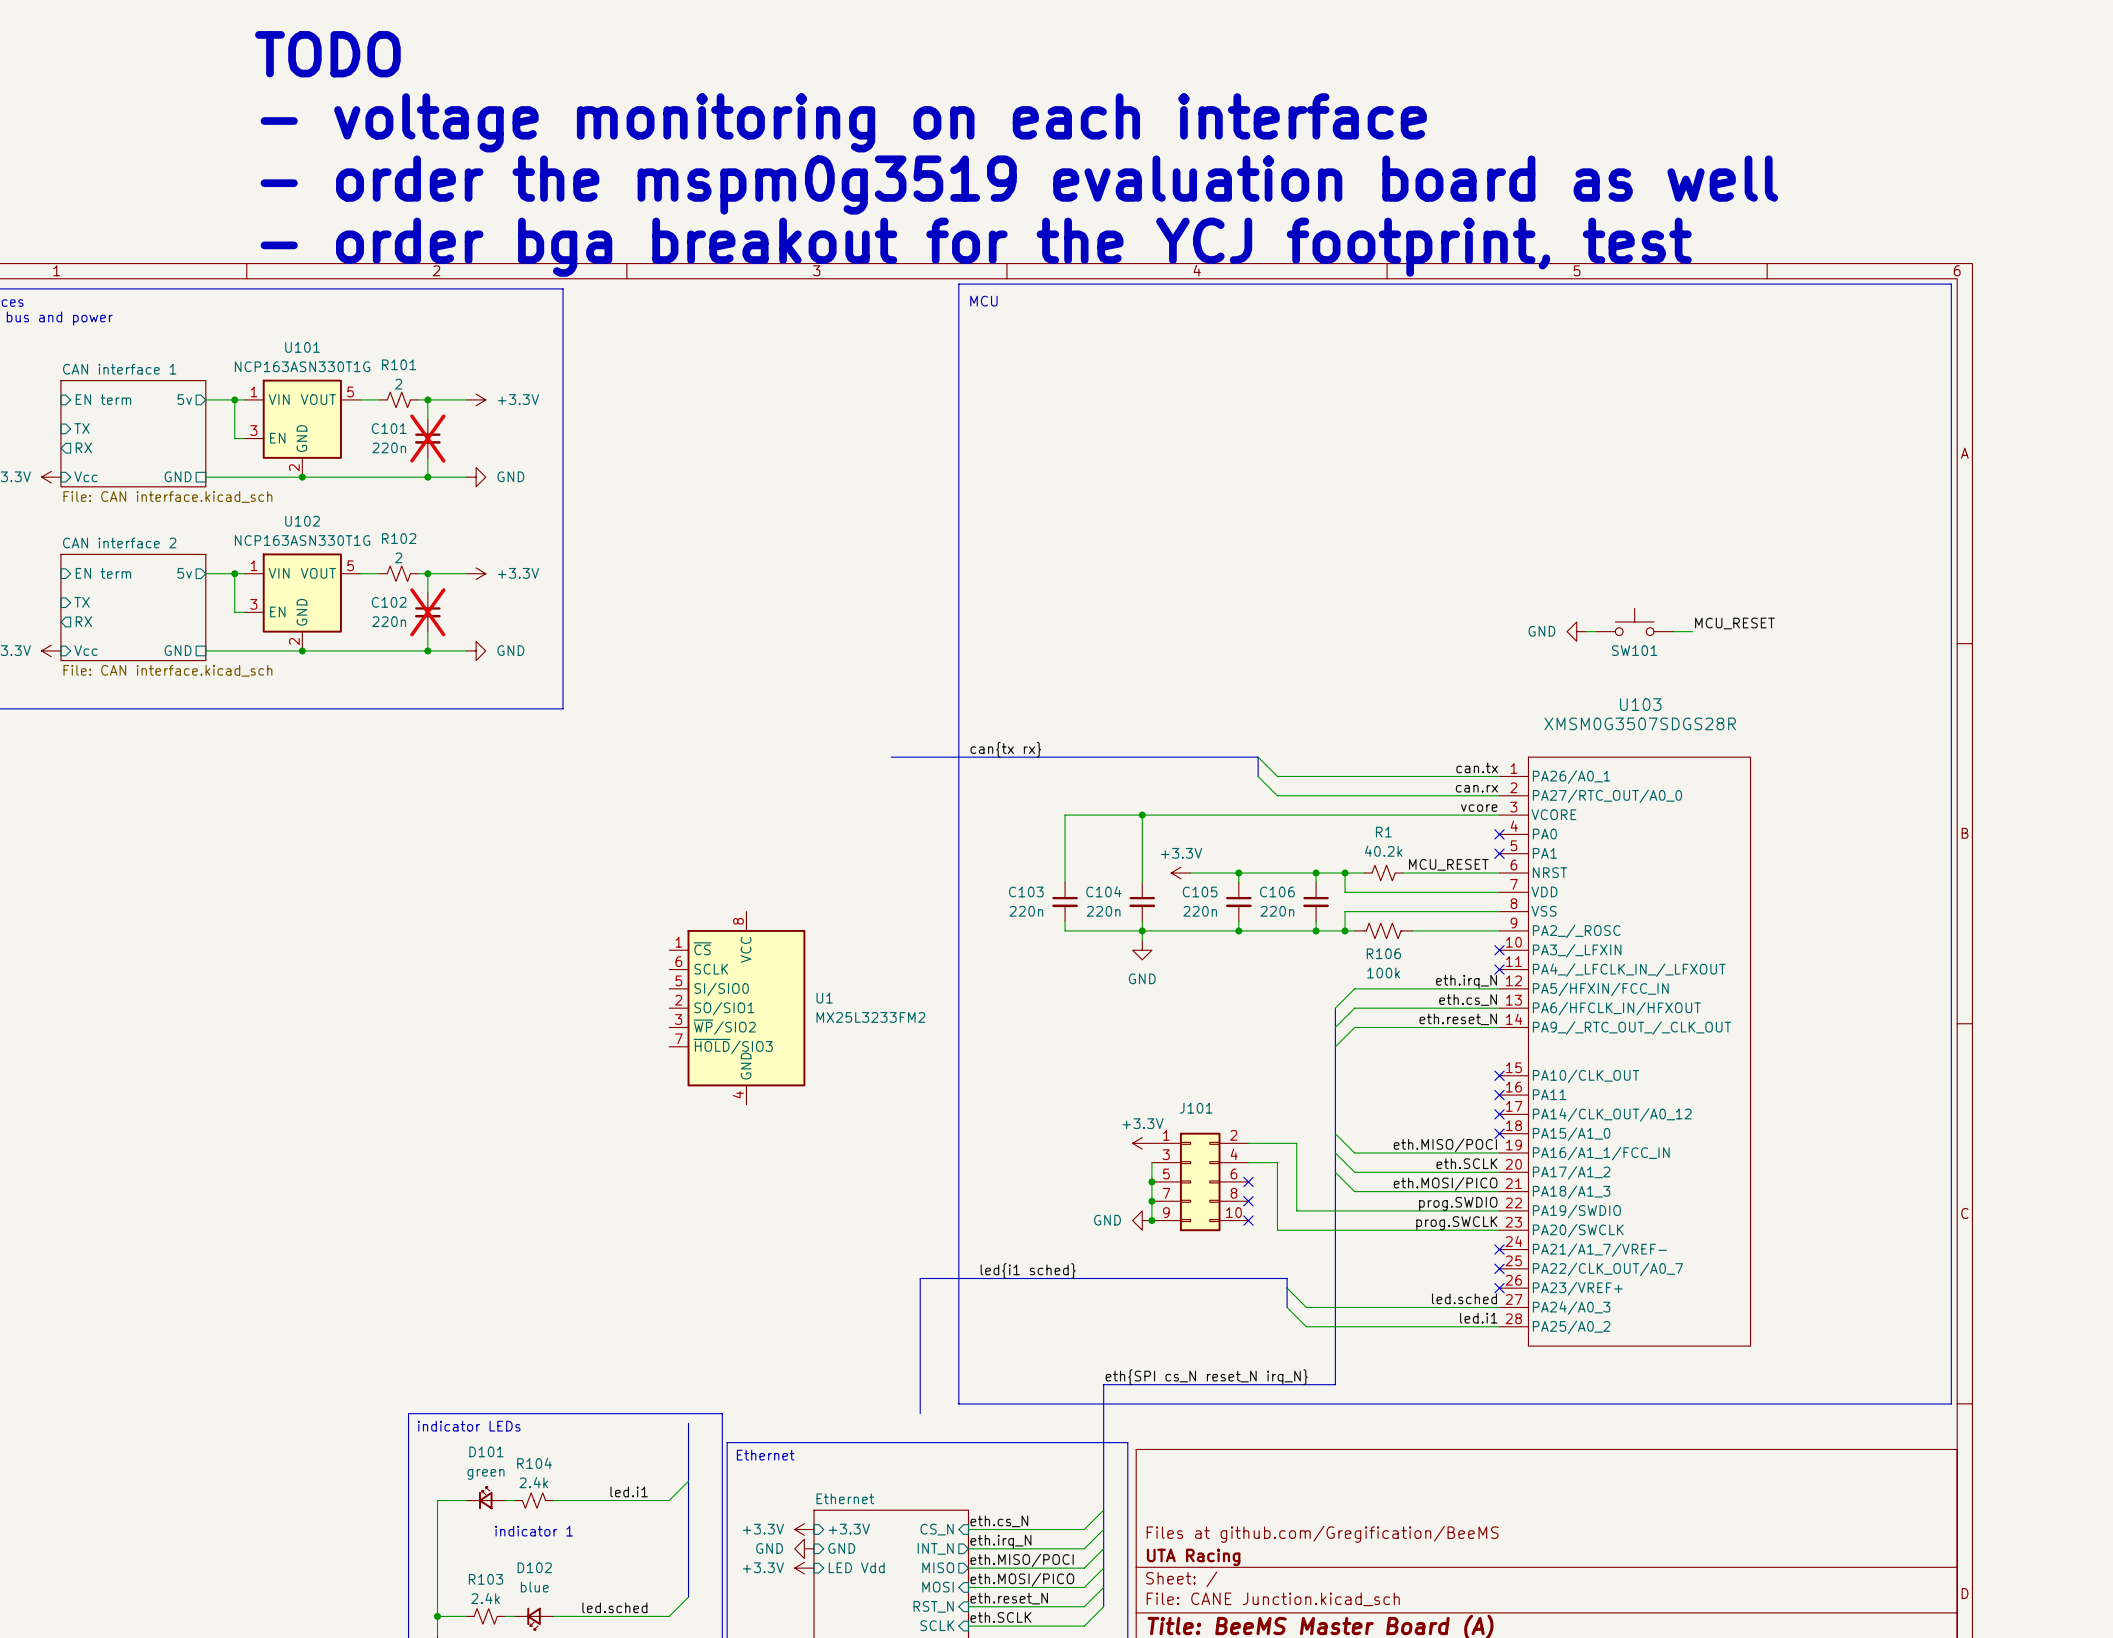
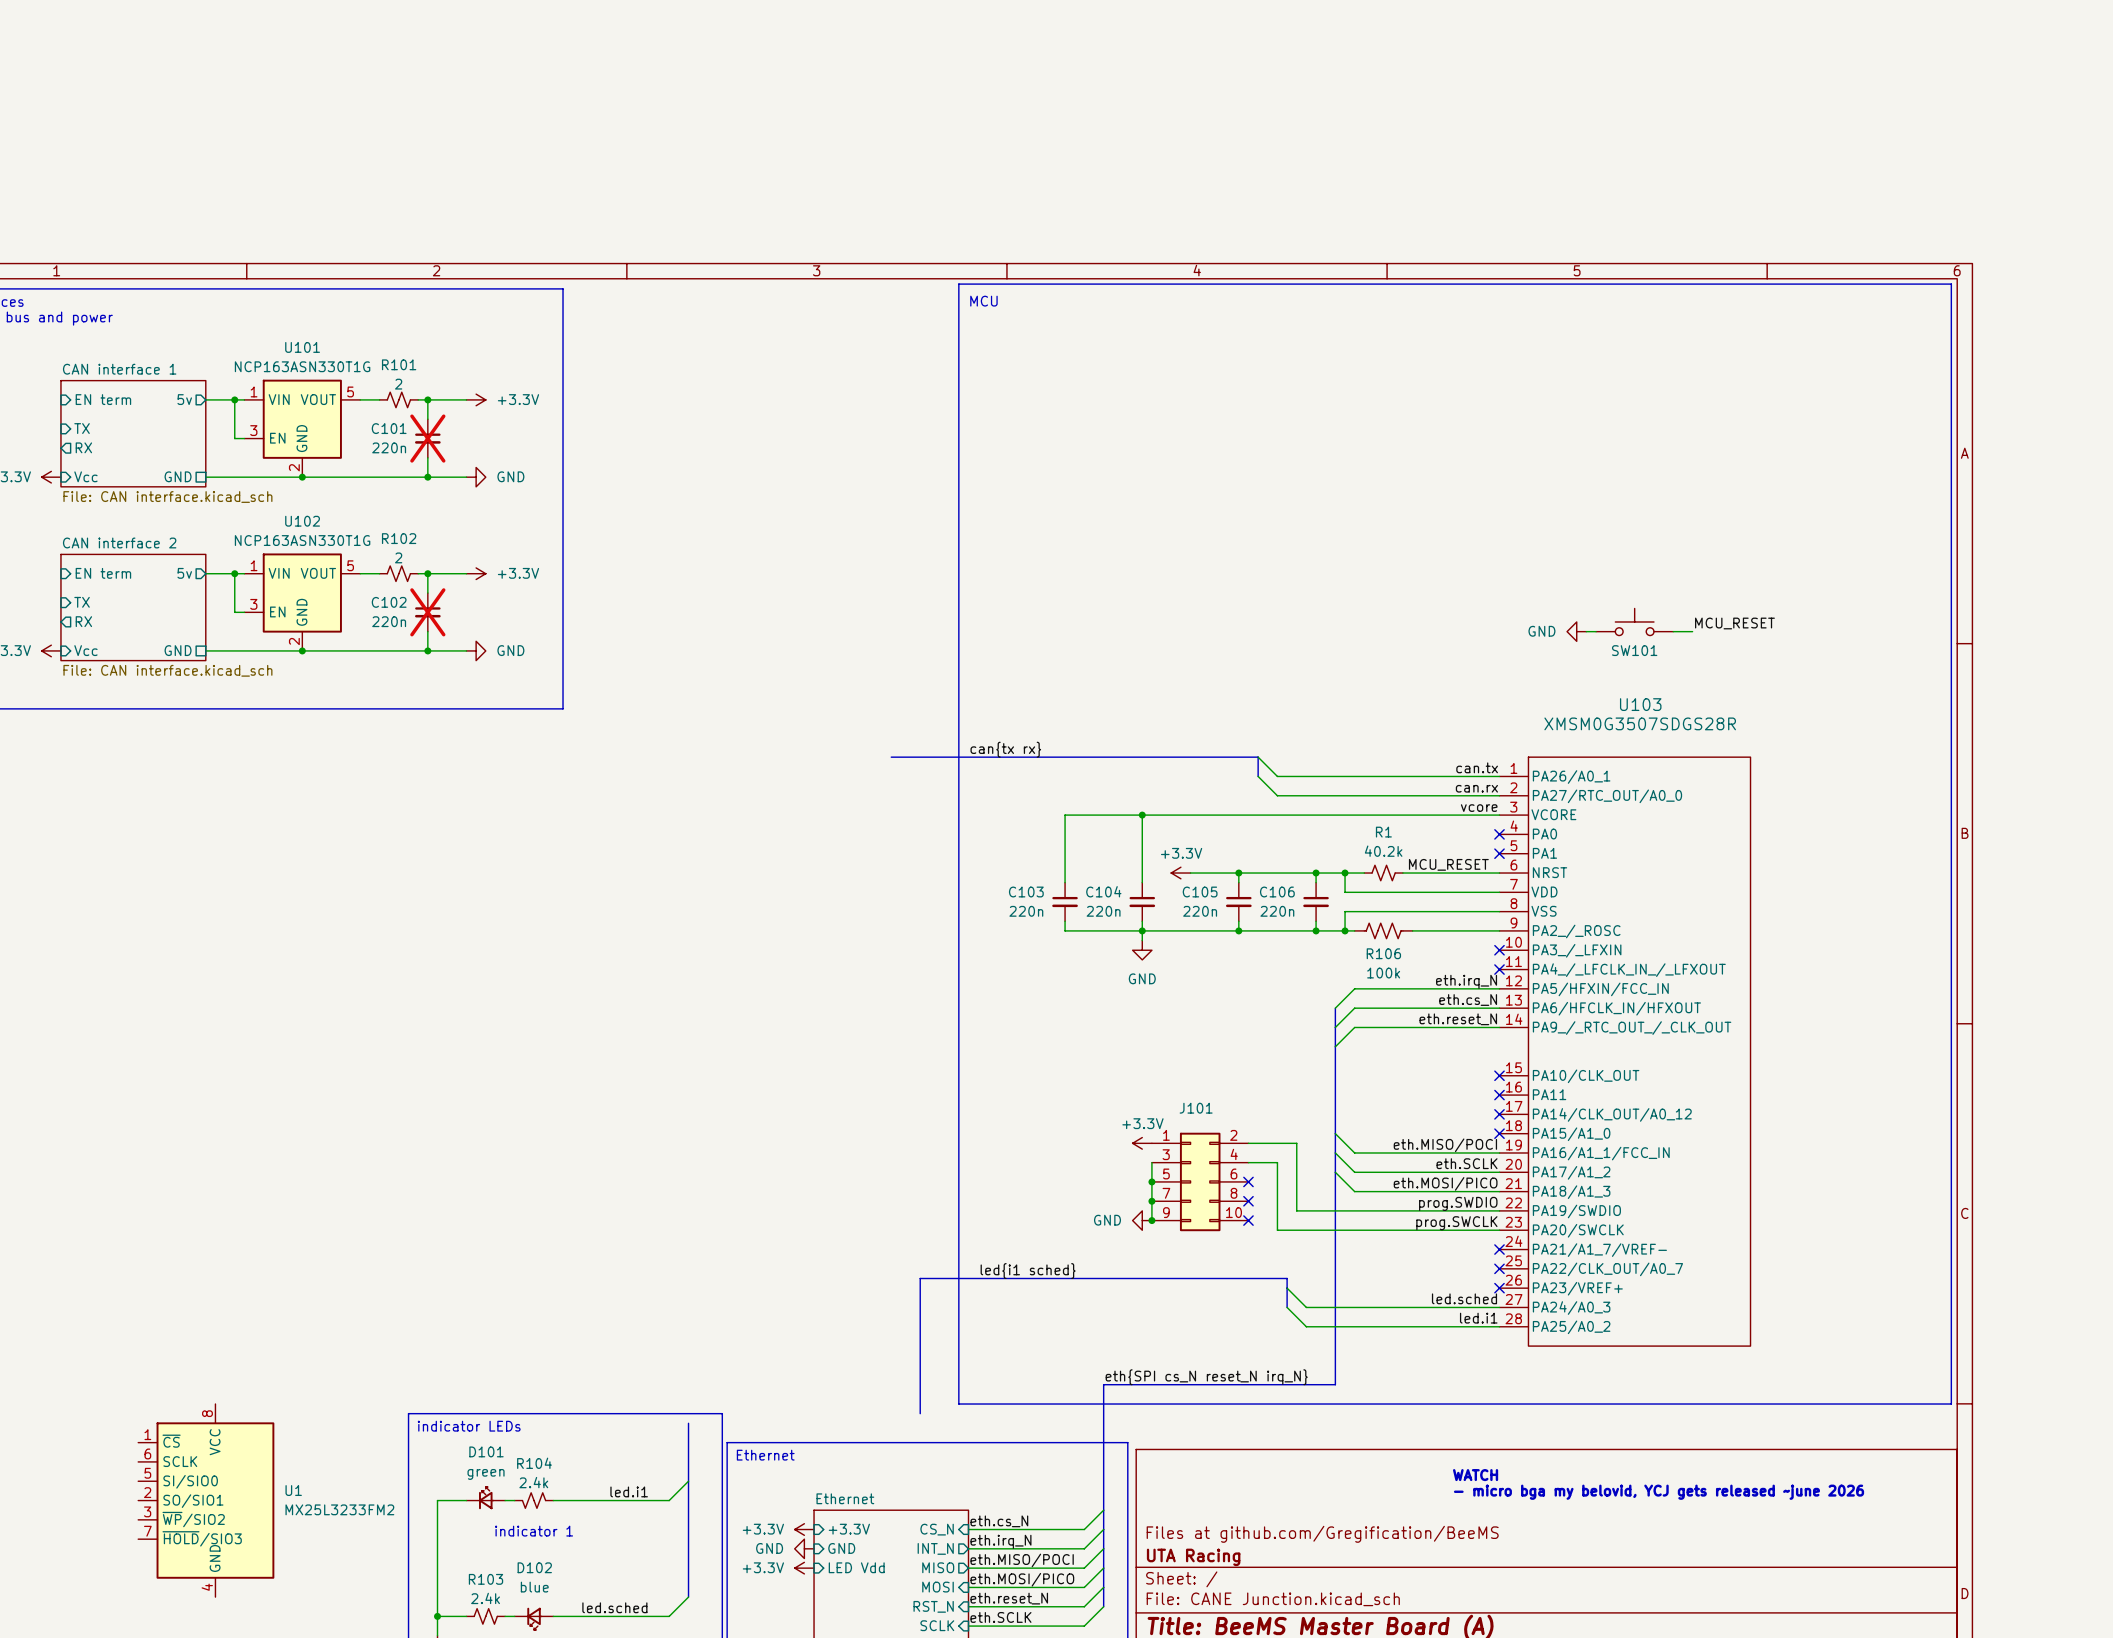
text: TODO (327, 54) -> none
text: - voltage monitoring on each interface (843, 122) -> none
text: - order the mspm0g3519 evaluation board as well (1019, 185) -> none
text: - order bga breakout for the YCJ footprint, test (976, 247) -> none
U1 position: (737, 1008) -> (206, 1500)
text: none -> WATCH (1475, 1475)
text: none -> - micro bga my belovid, YCJ gets released ~june 2026 (1659, 1492)

